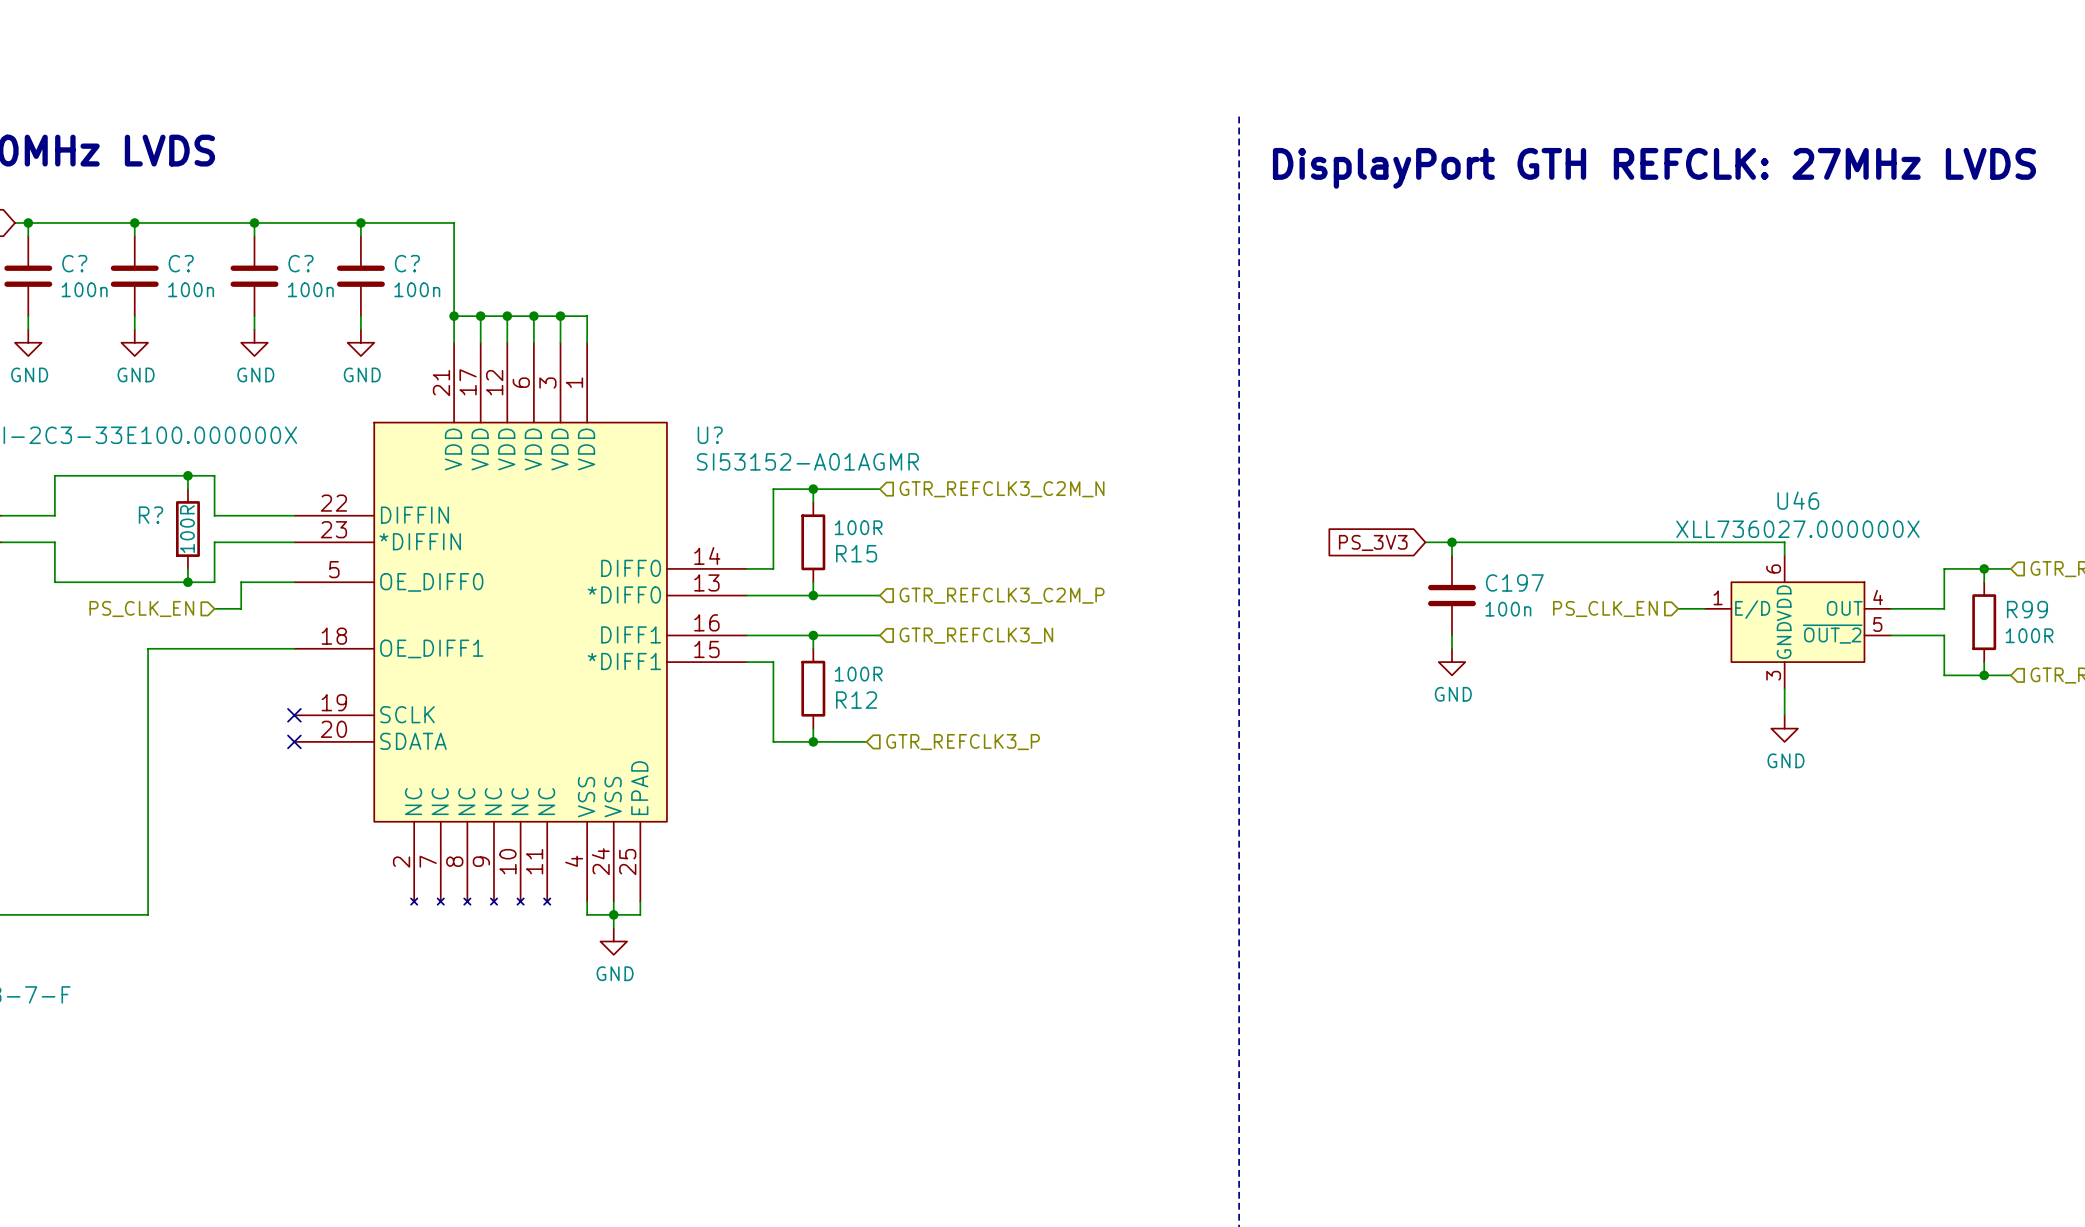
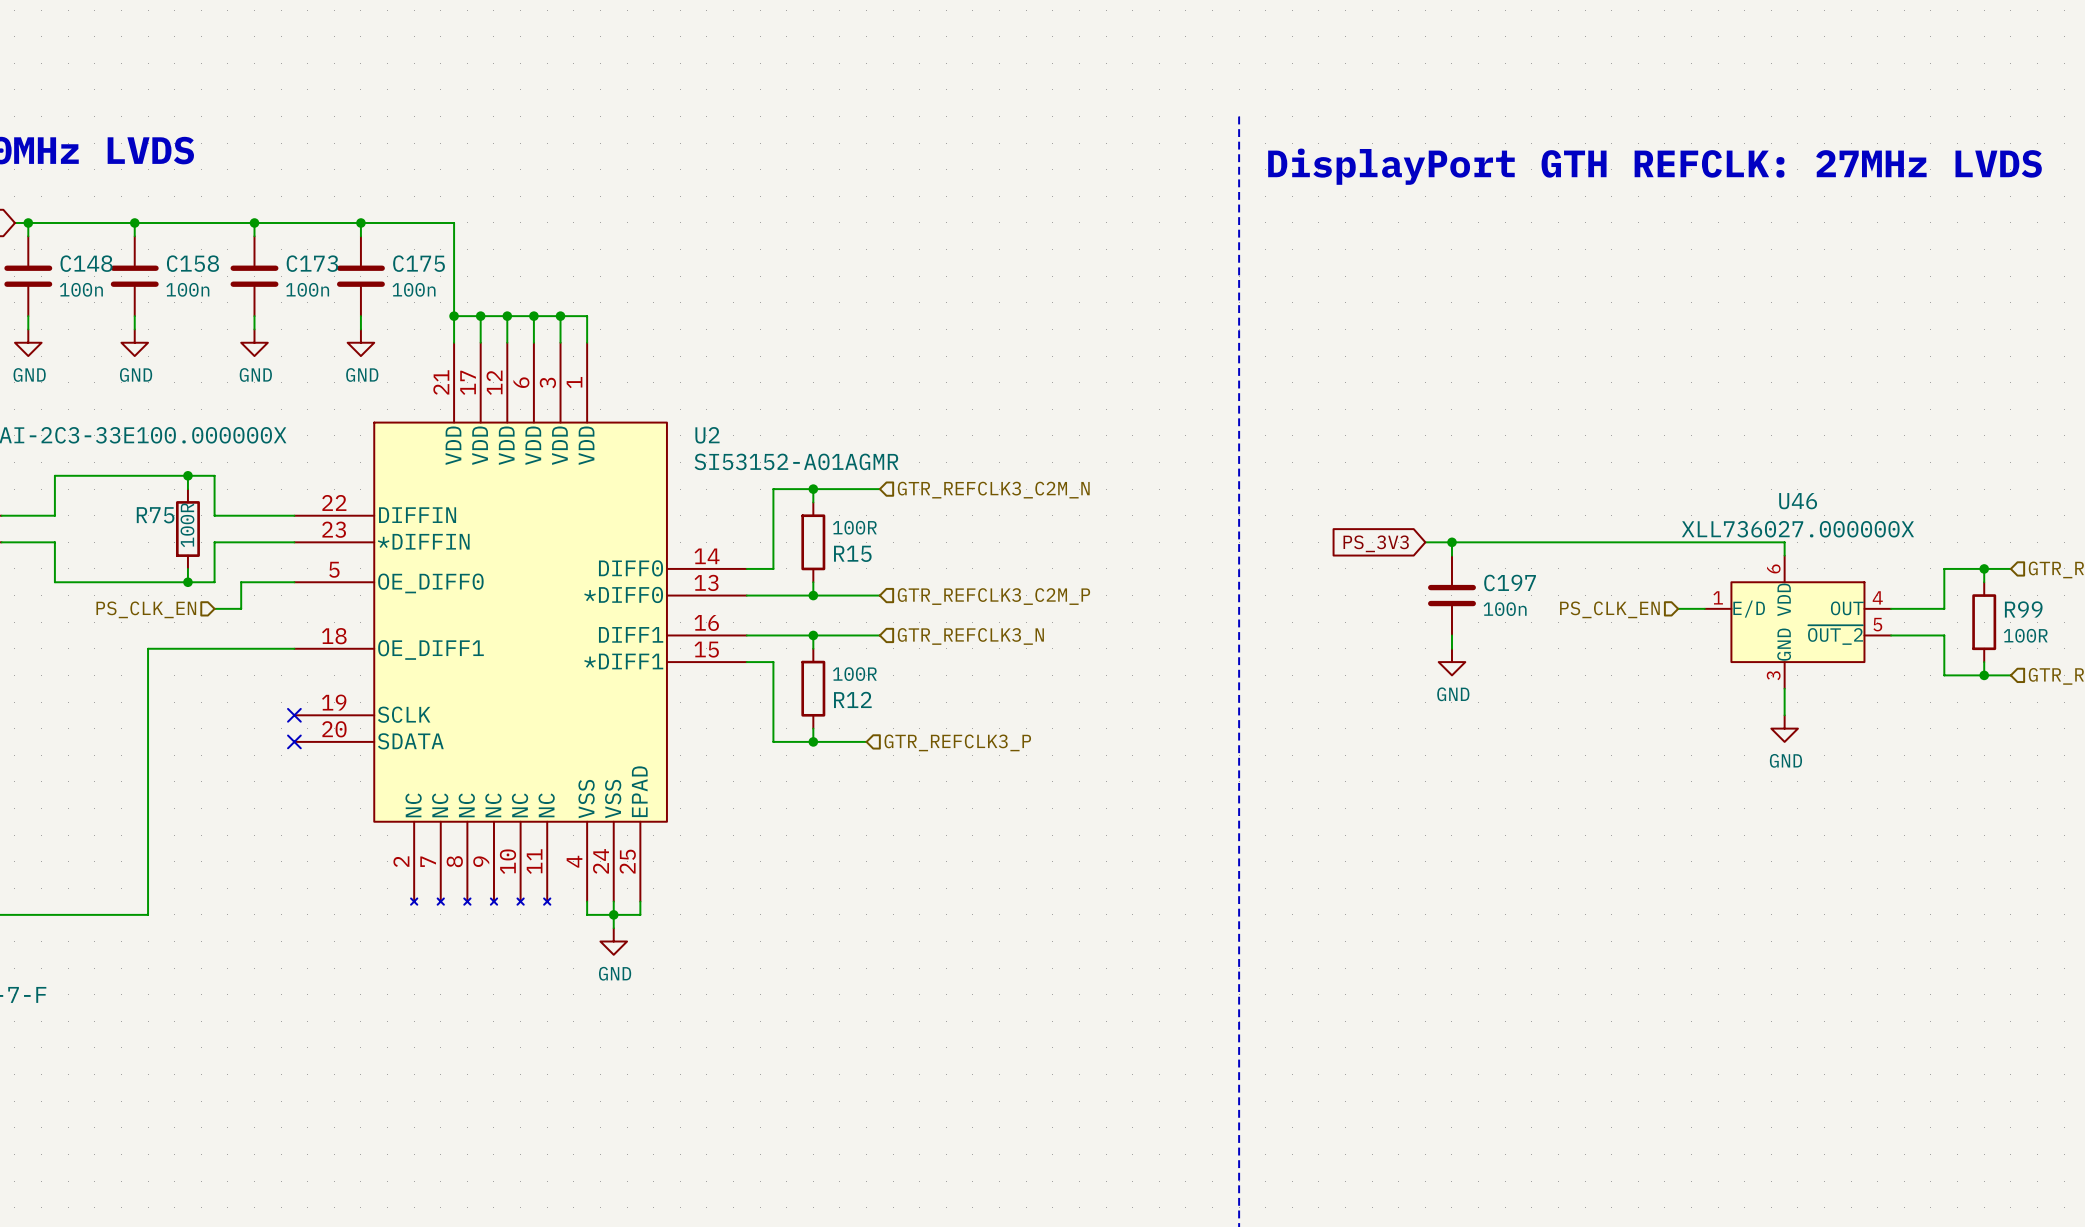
C? name: C? (74, 263) -> C148 (86, 263)
C? name: C? (181, 263) -> C158 (192, 263)
C? name: C? (300, 263) -> C173 (312, 263)
C? name: C? (407, 263) -> C175 (419, 263)
U? name: U? (710, 435) -> U2 (707, 435)
R? name: R? (151, 515) -> R75 (155, 515)

